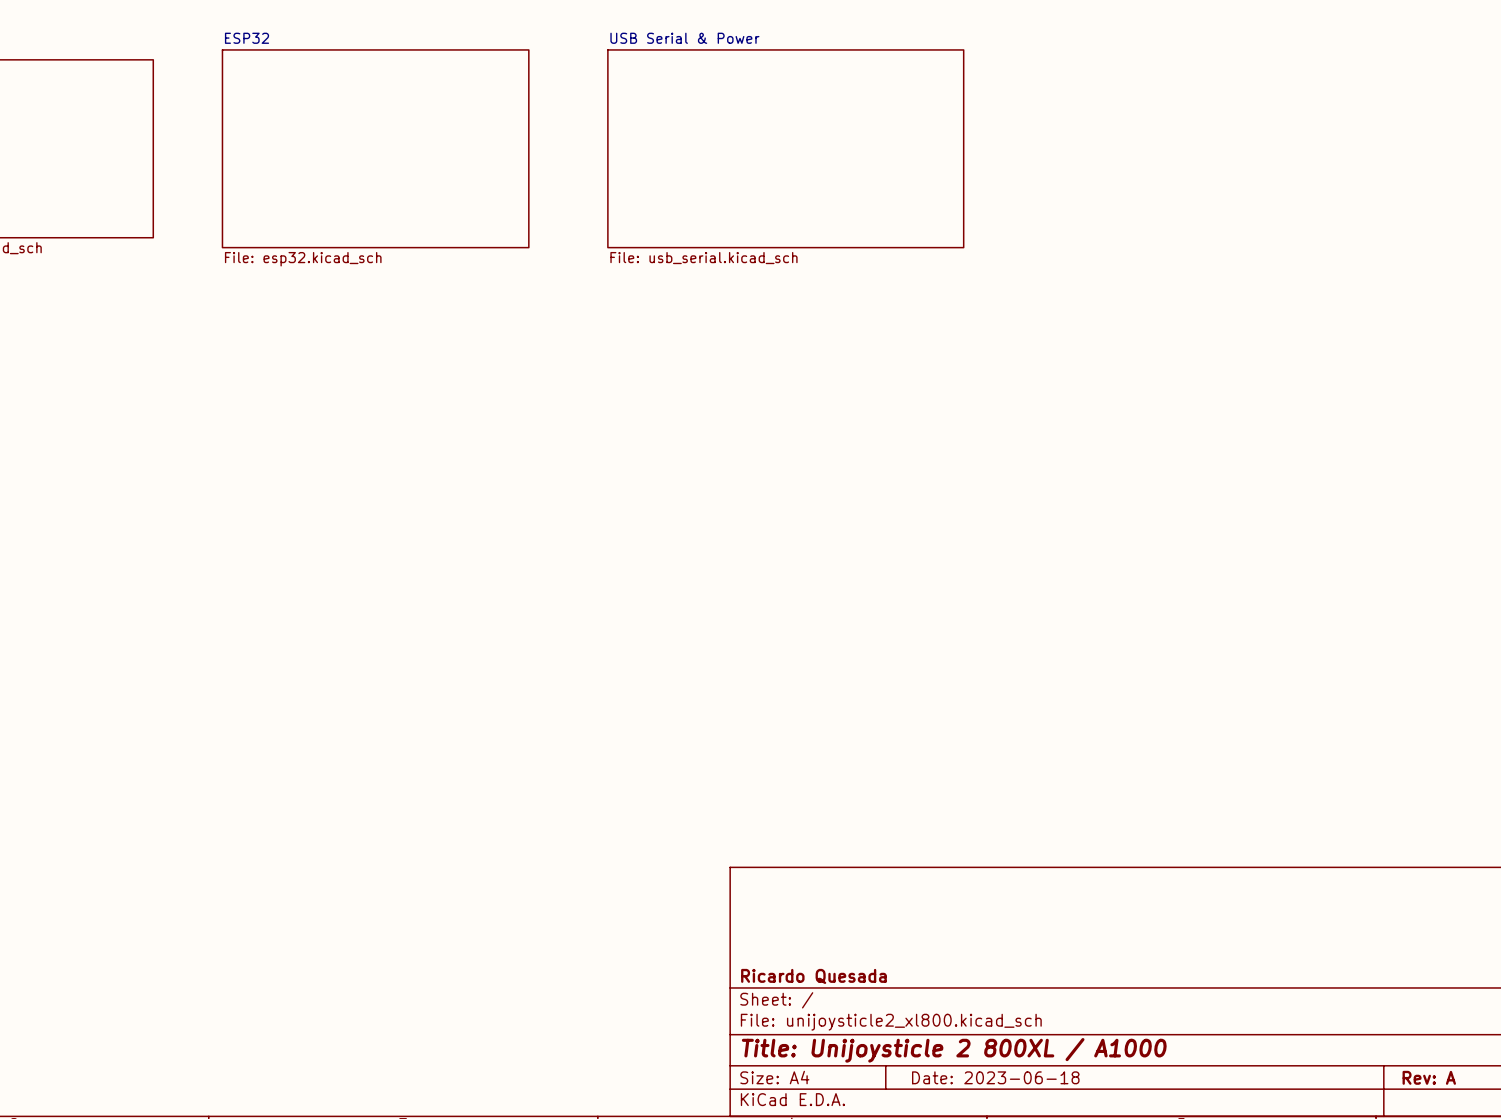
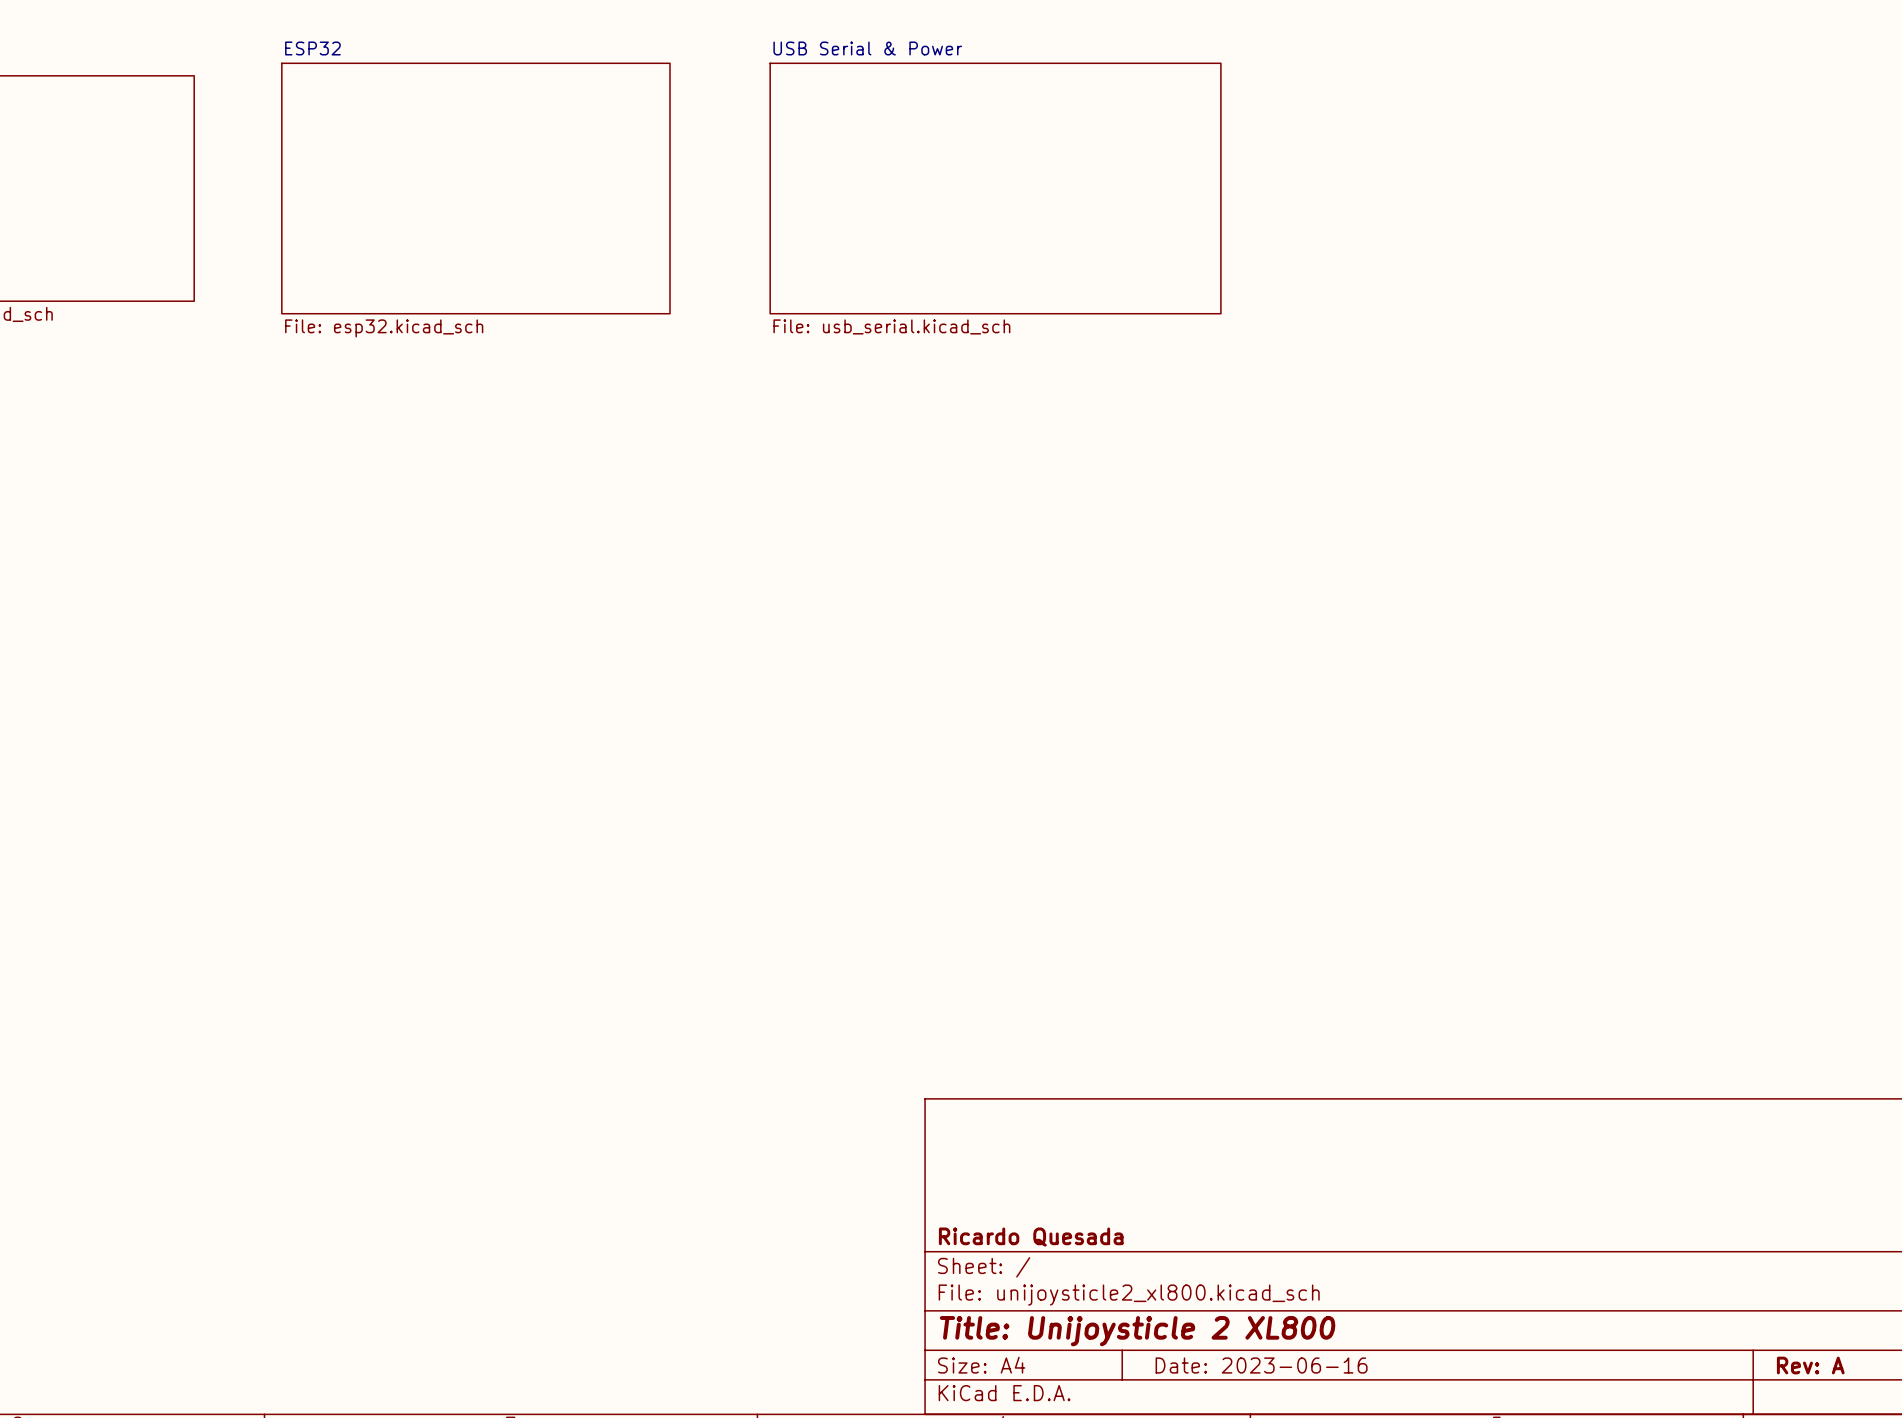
title block: Title: Unijoysticle 2 800XL / A1000 (954, 1050) -> Title: Unijoysticle 2 XL800 (1137, 1331)
title block: Date: 2023-06-18 (995, 1077) -> Date: 2023-06-16 (1261, 1365)

